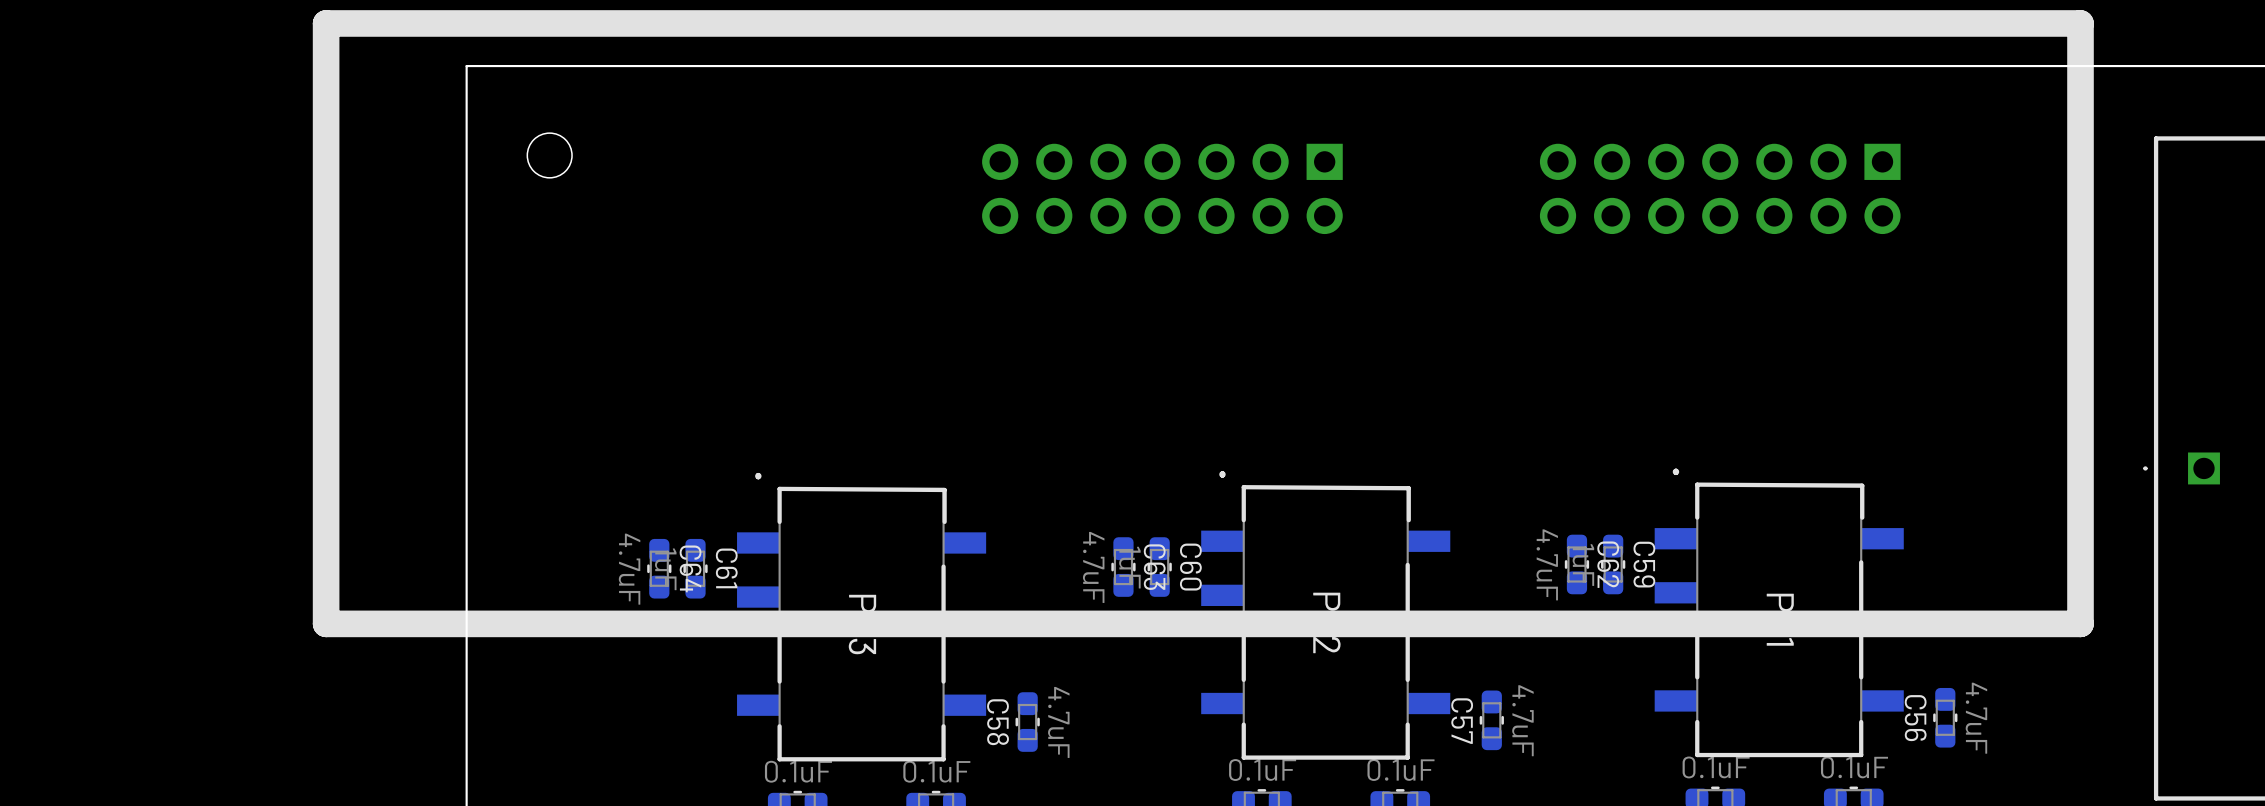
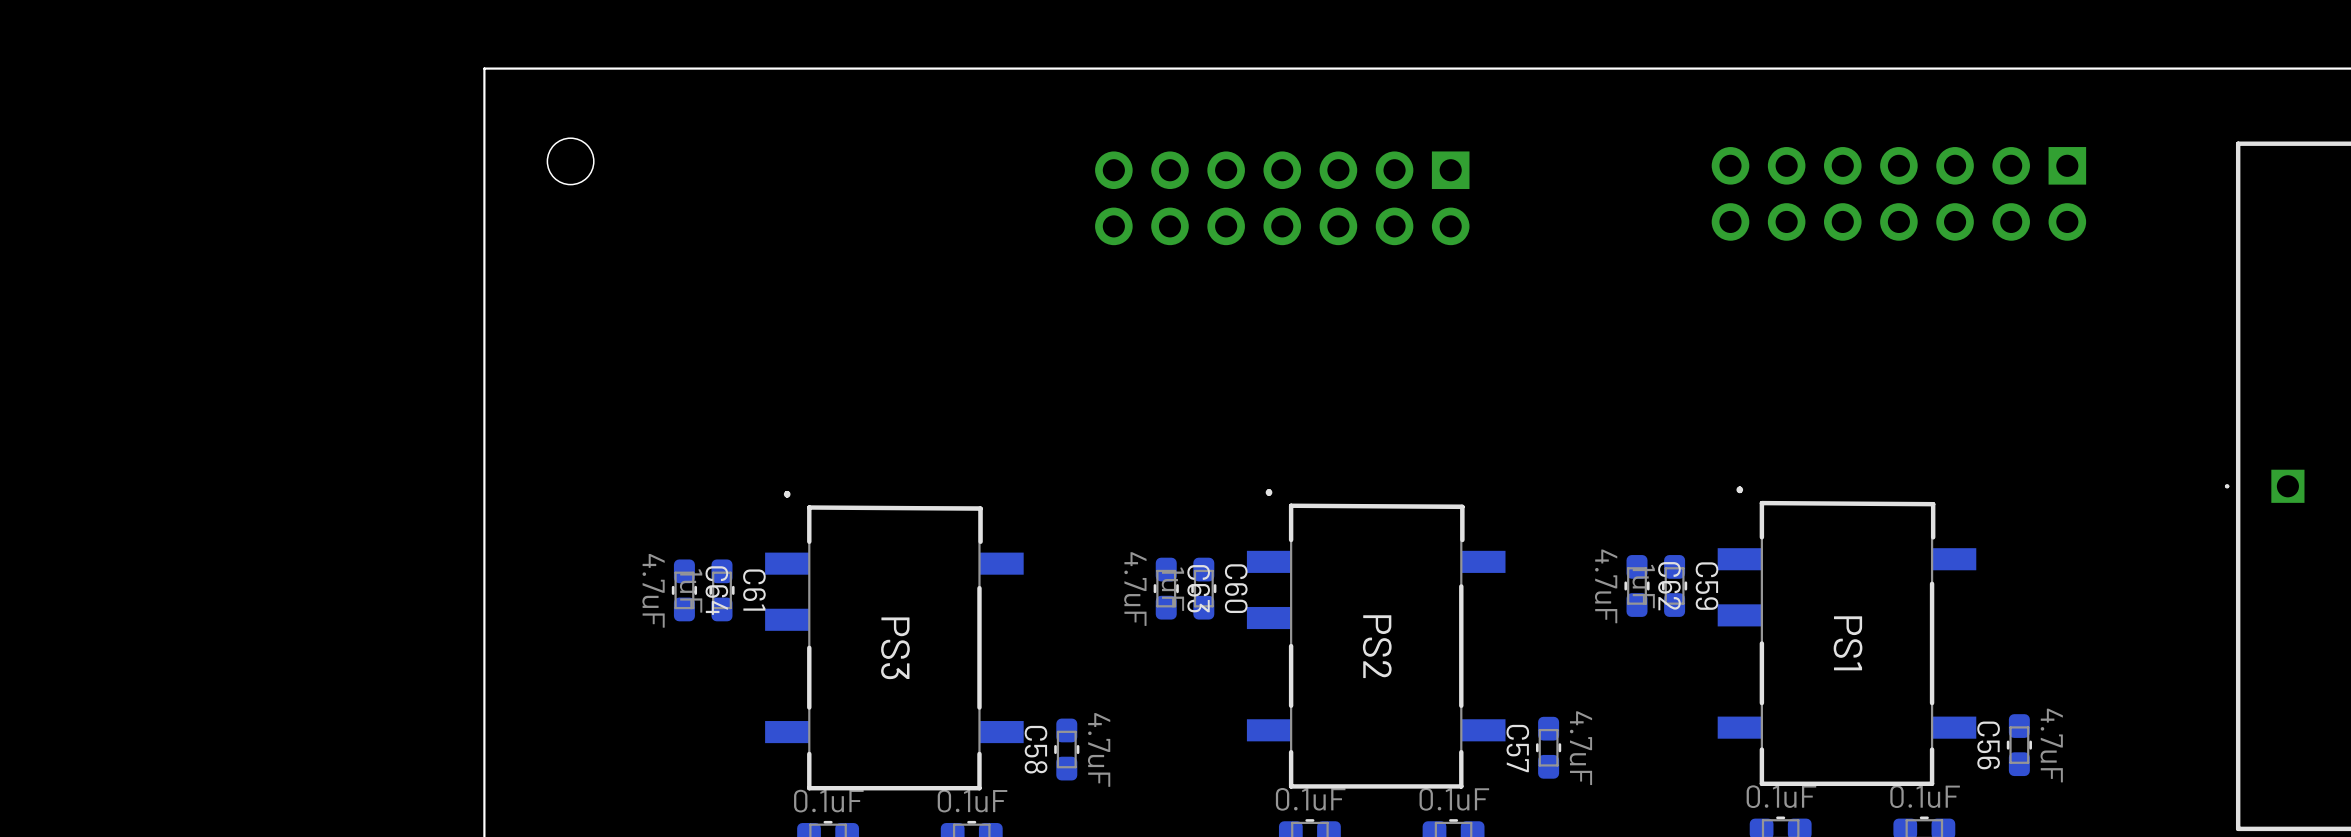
line: (2080, 23) (326, 23) (326, 623) (2080, 623) (2080, 23) -> none
part position: (1162, 188) -> (1282, 198)
part position: (1720, 188) -> (1898, 193)

